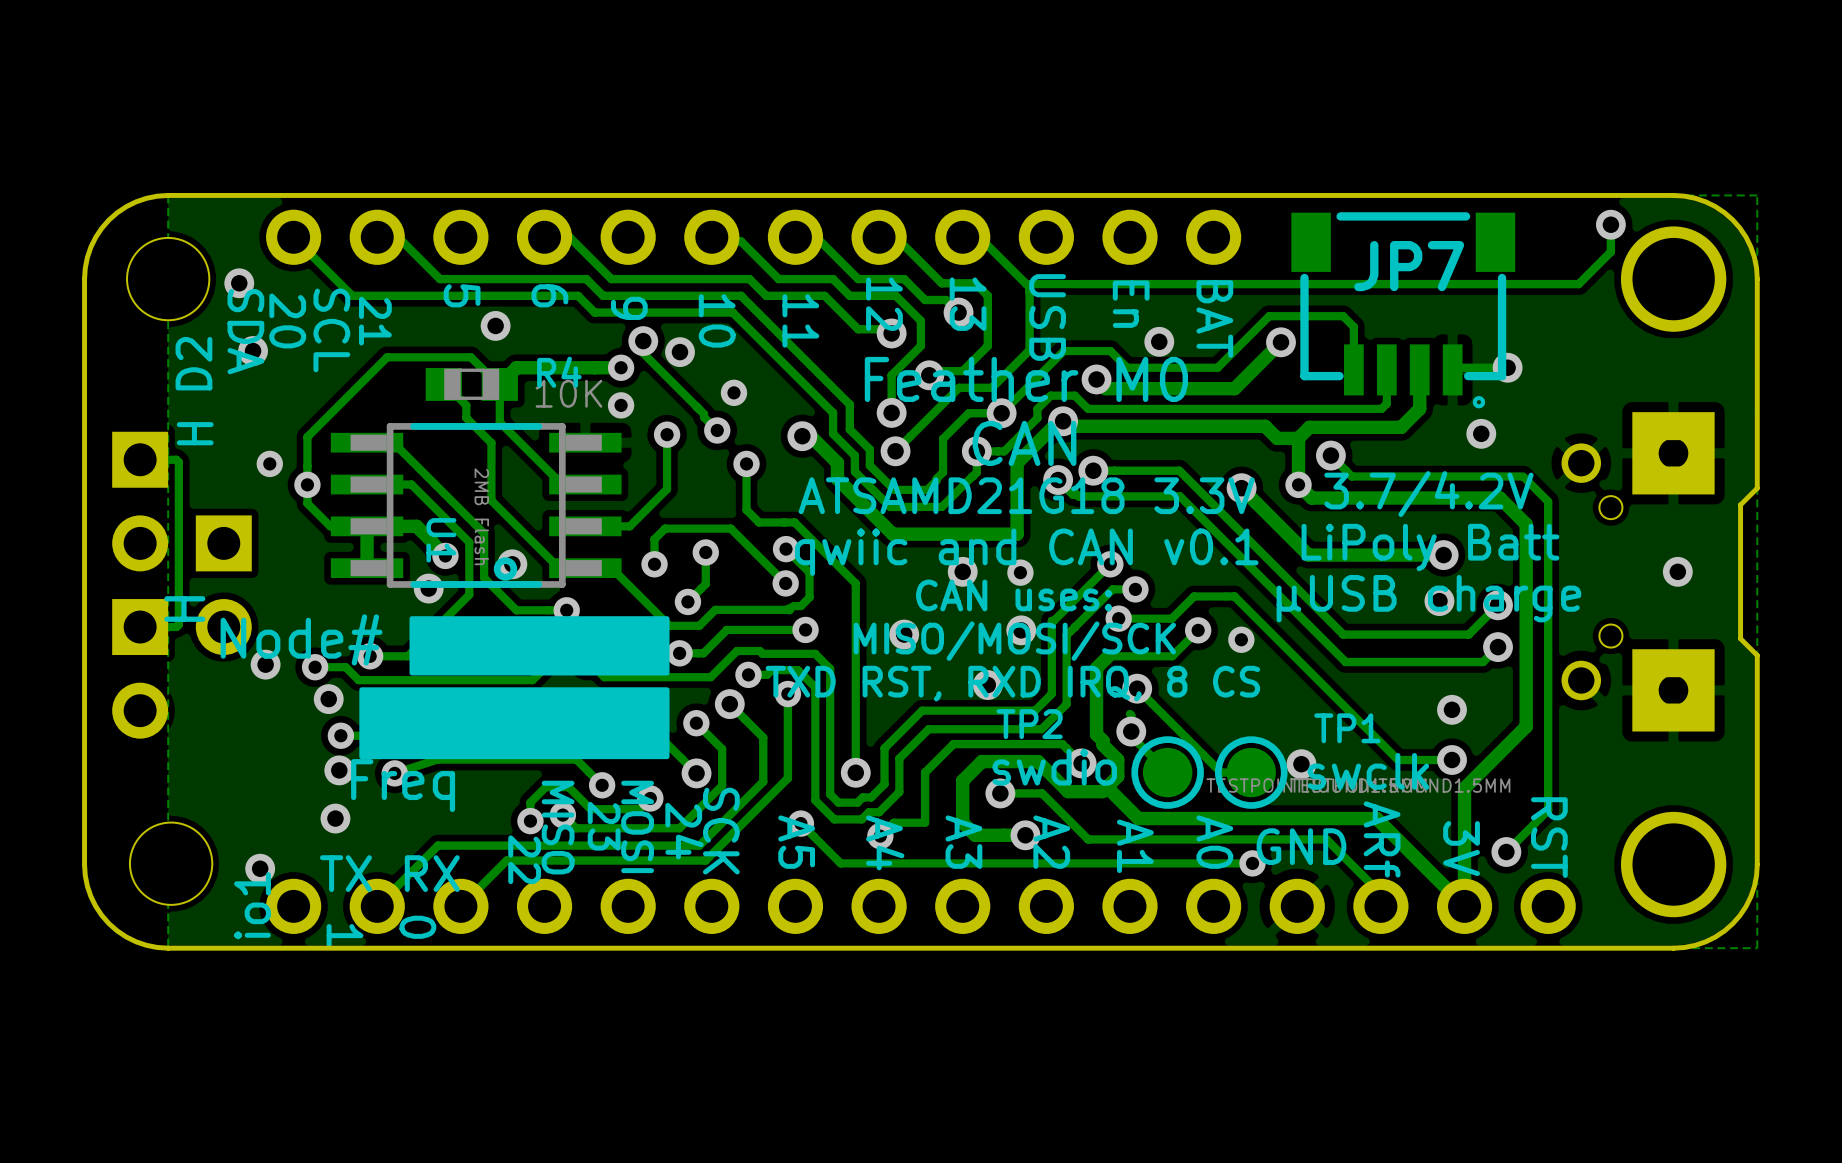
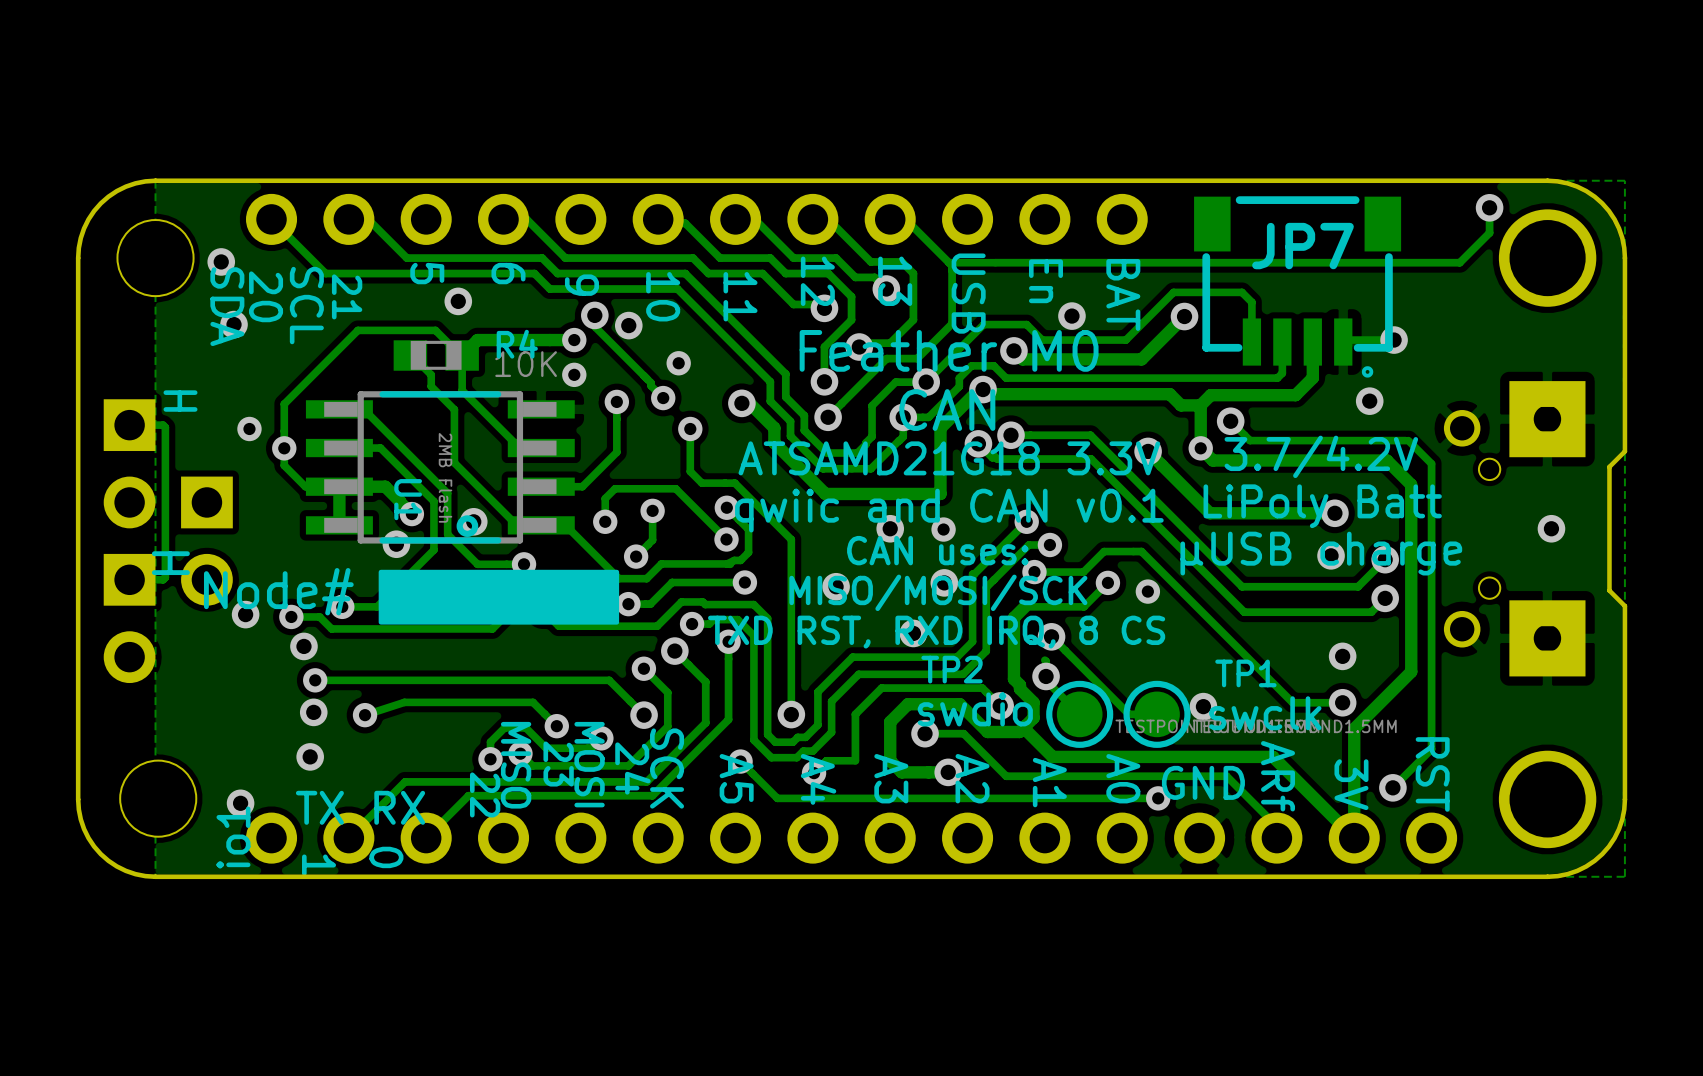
text: D2 (193, 363) -> none
drawing: [359, 687, 670, 760] -> none
text: Freq (403, 785) -> none

